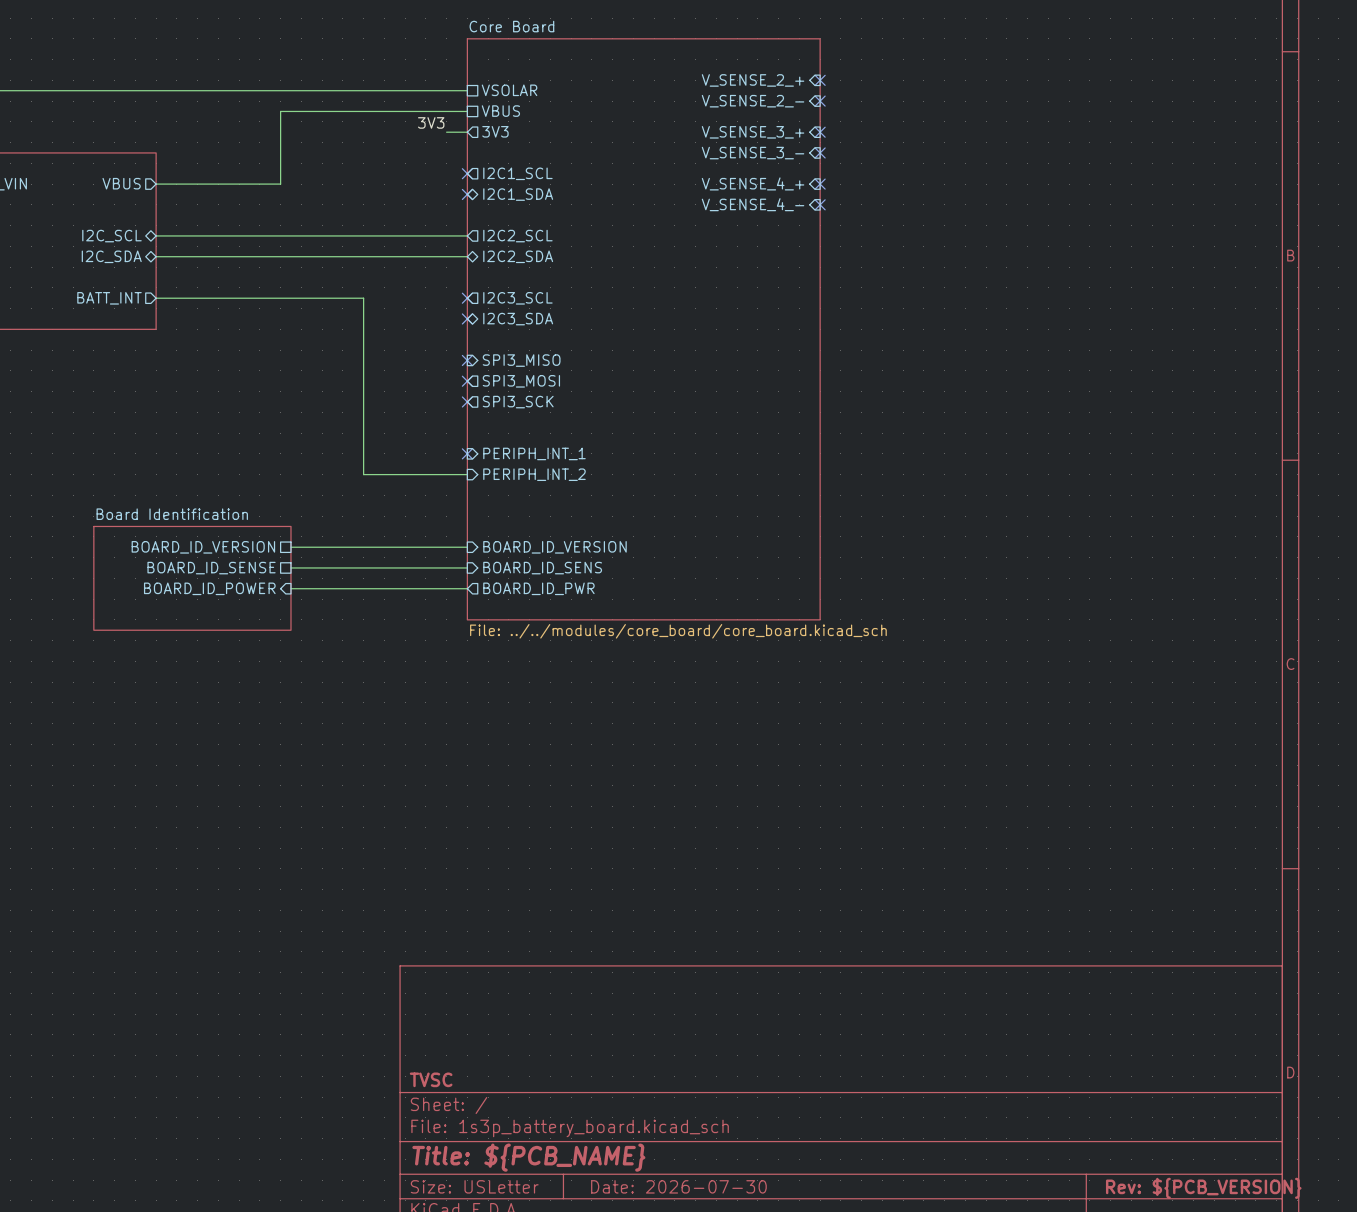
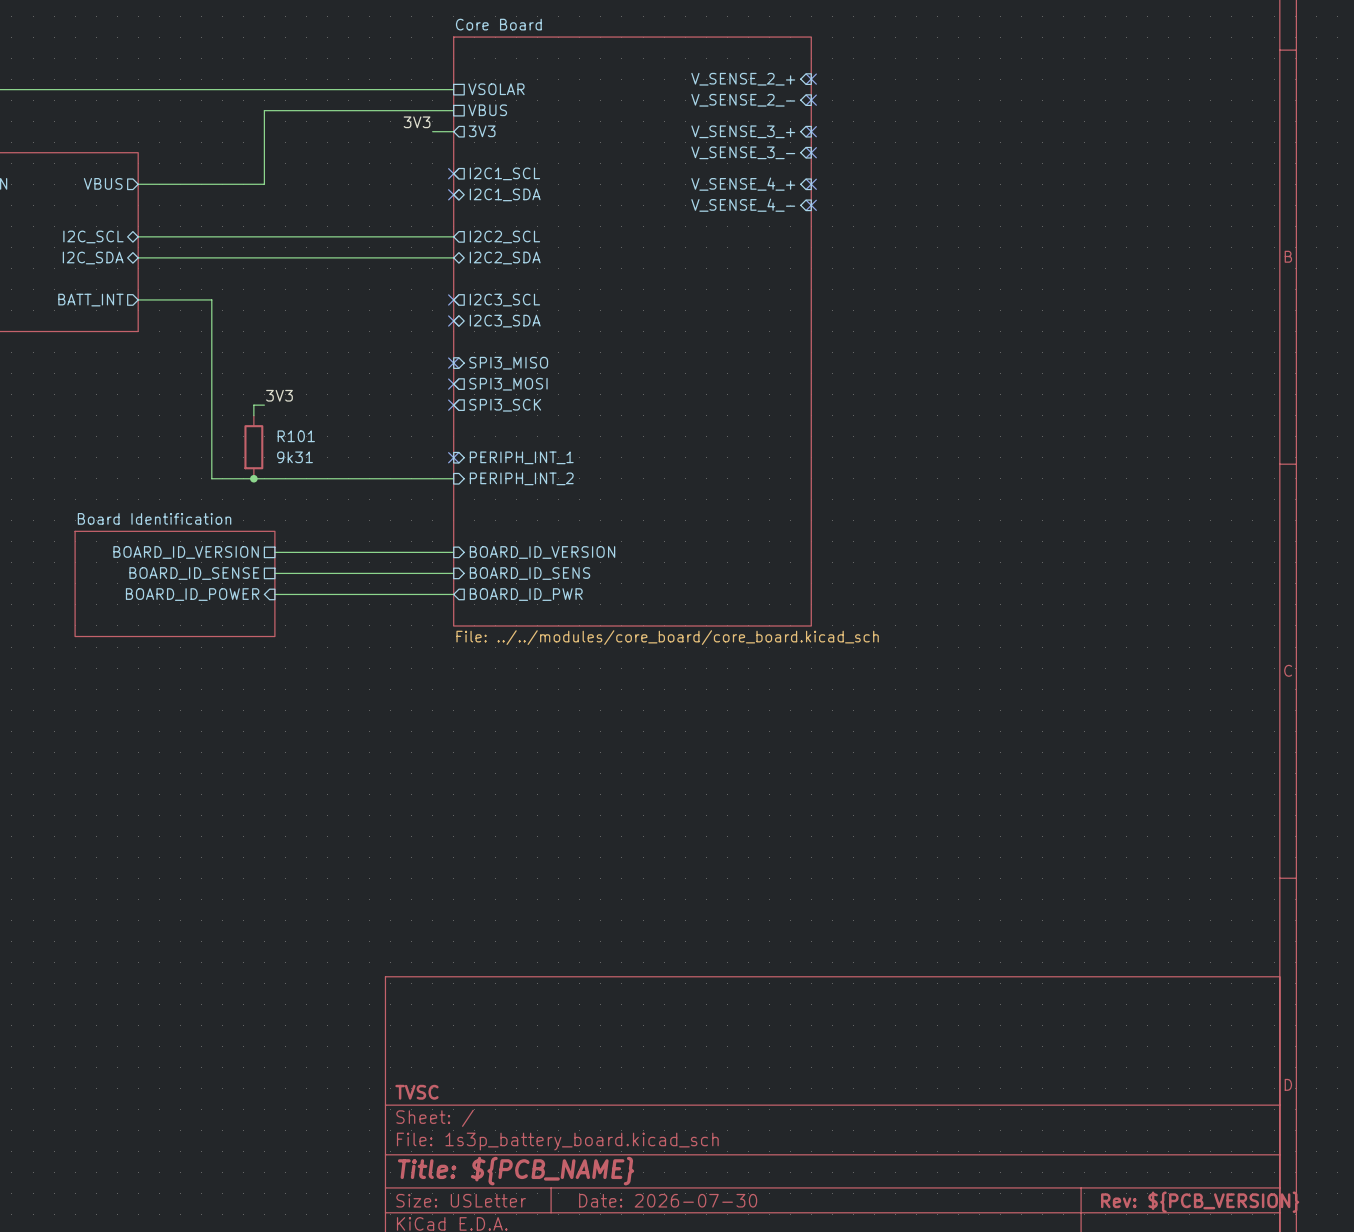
wire: (228, 298) (363, 298) (363, 474) -> (211, 299) (211, 478) (348, 478)
label: none -> 3V3 (279, 395)
wire: none -> (264, 405) (253, 405) (253, 415)
R101: none -> 9k31 (253, 447)
junction: none -> (253, 478)

